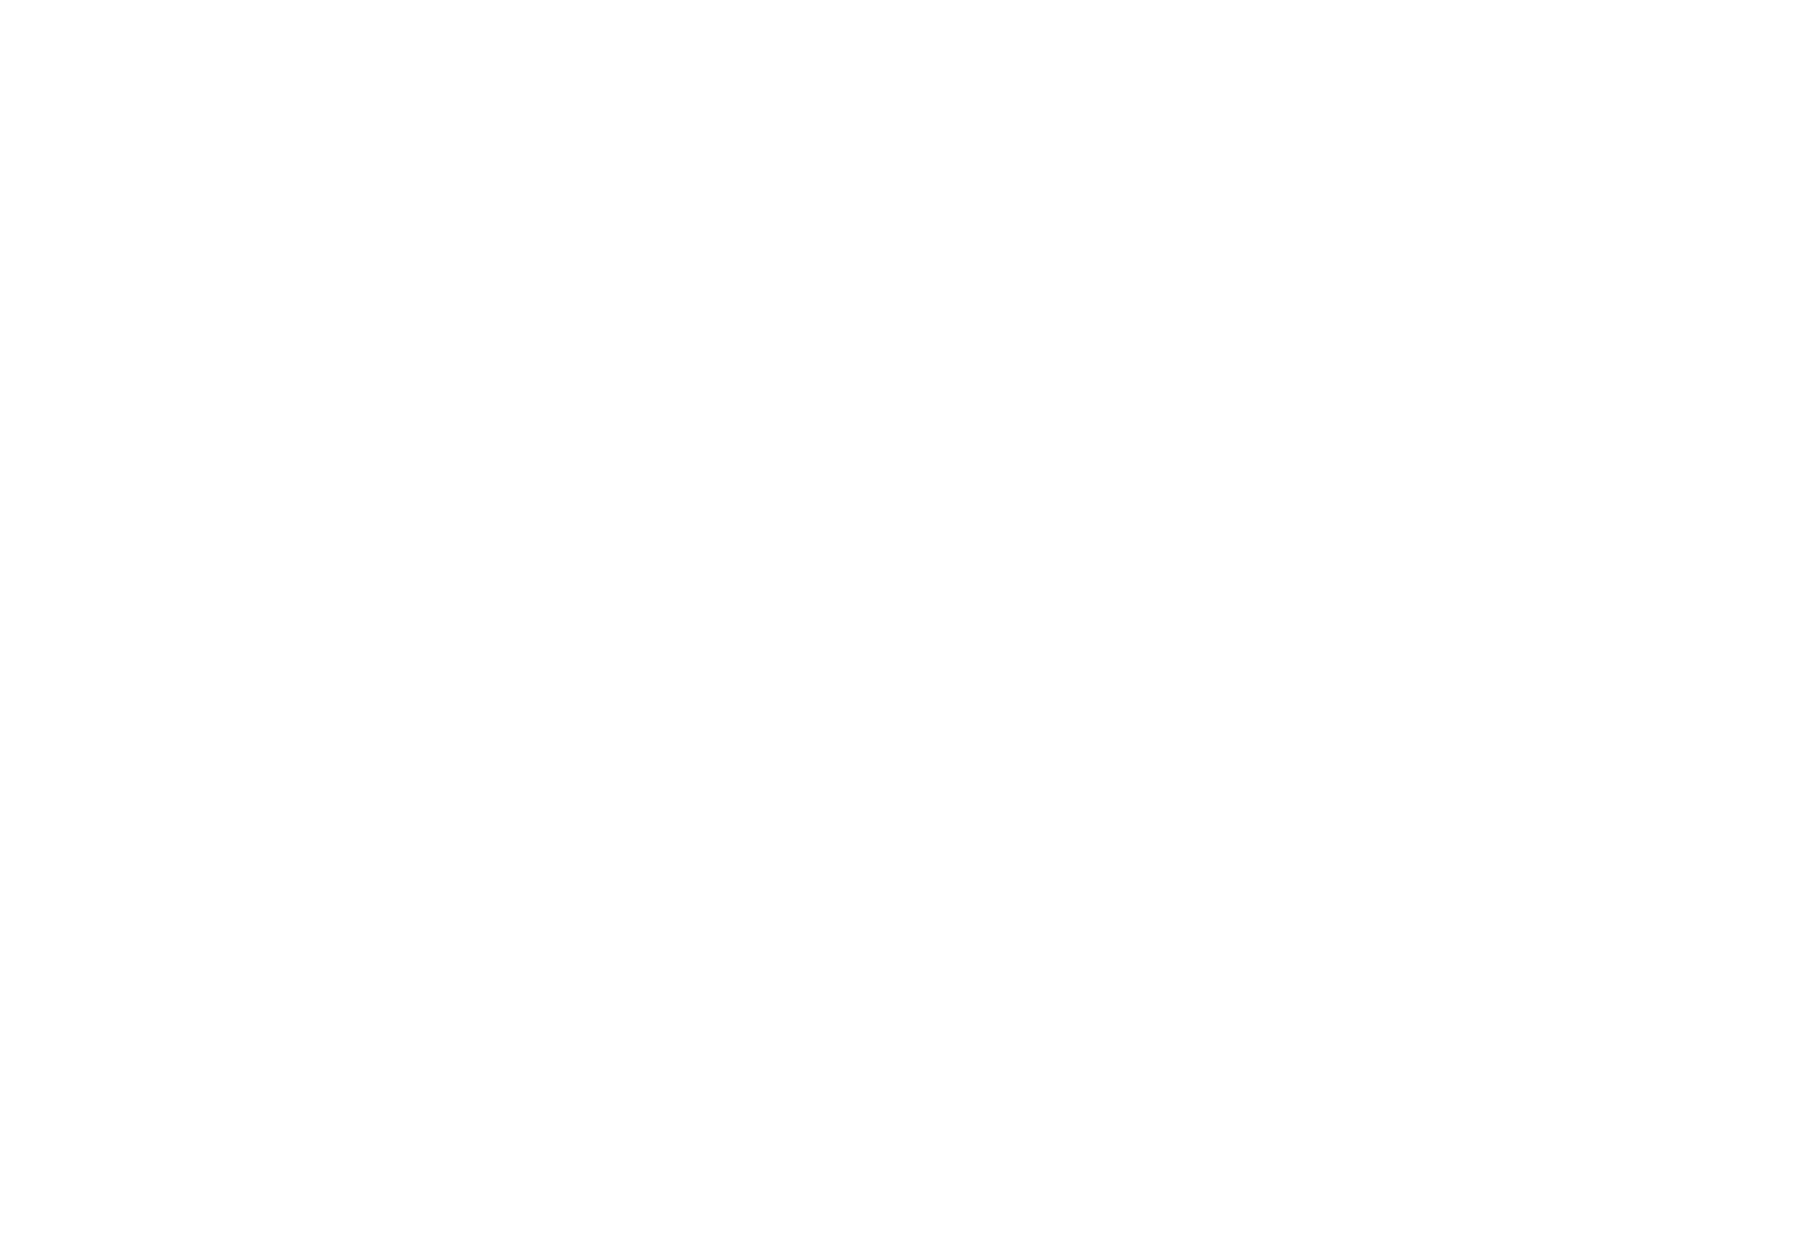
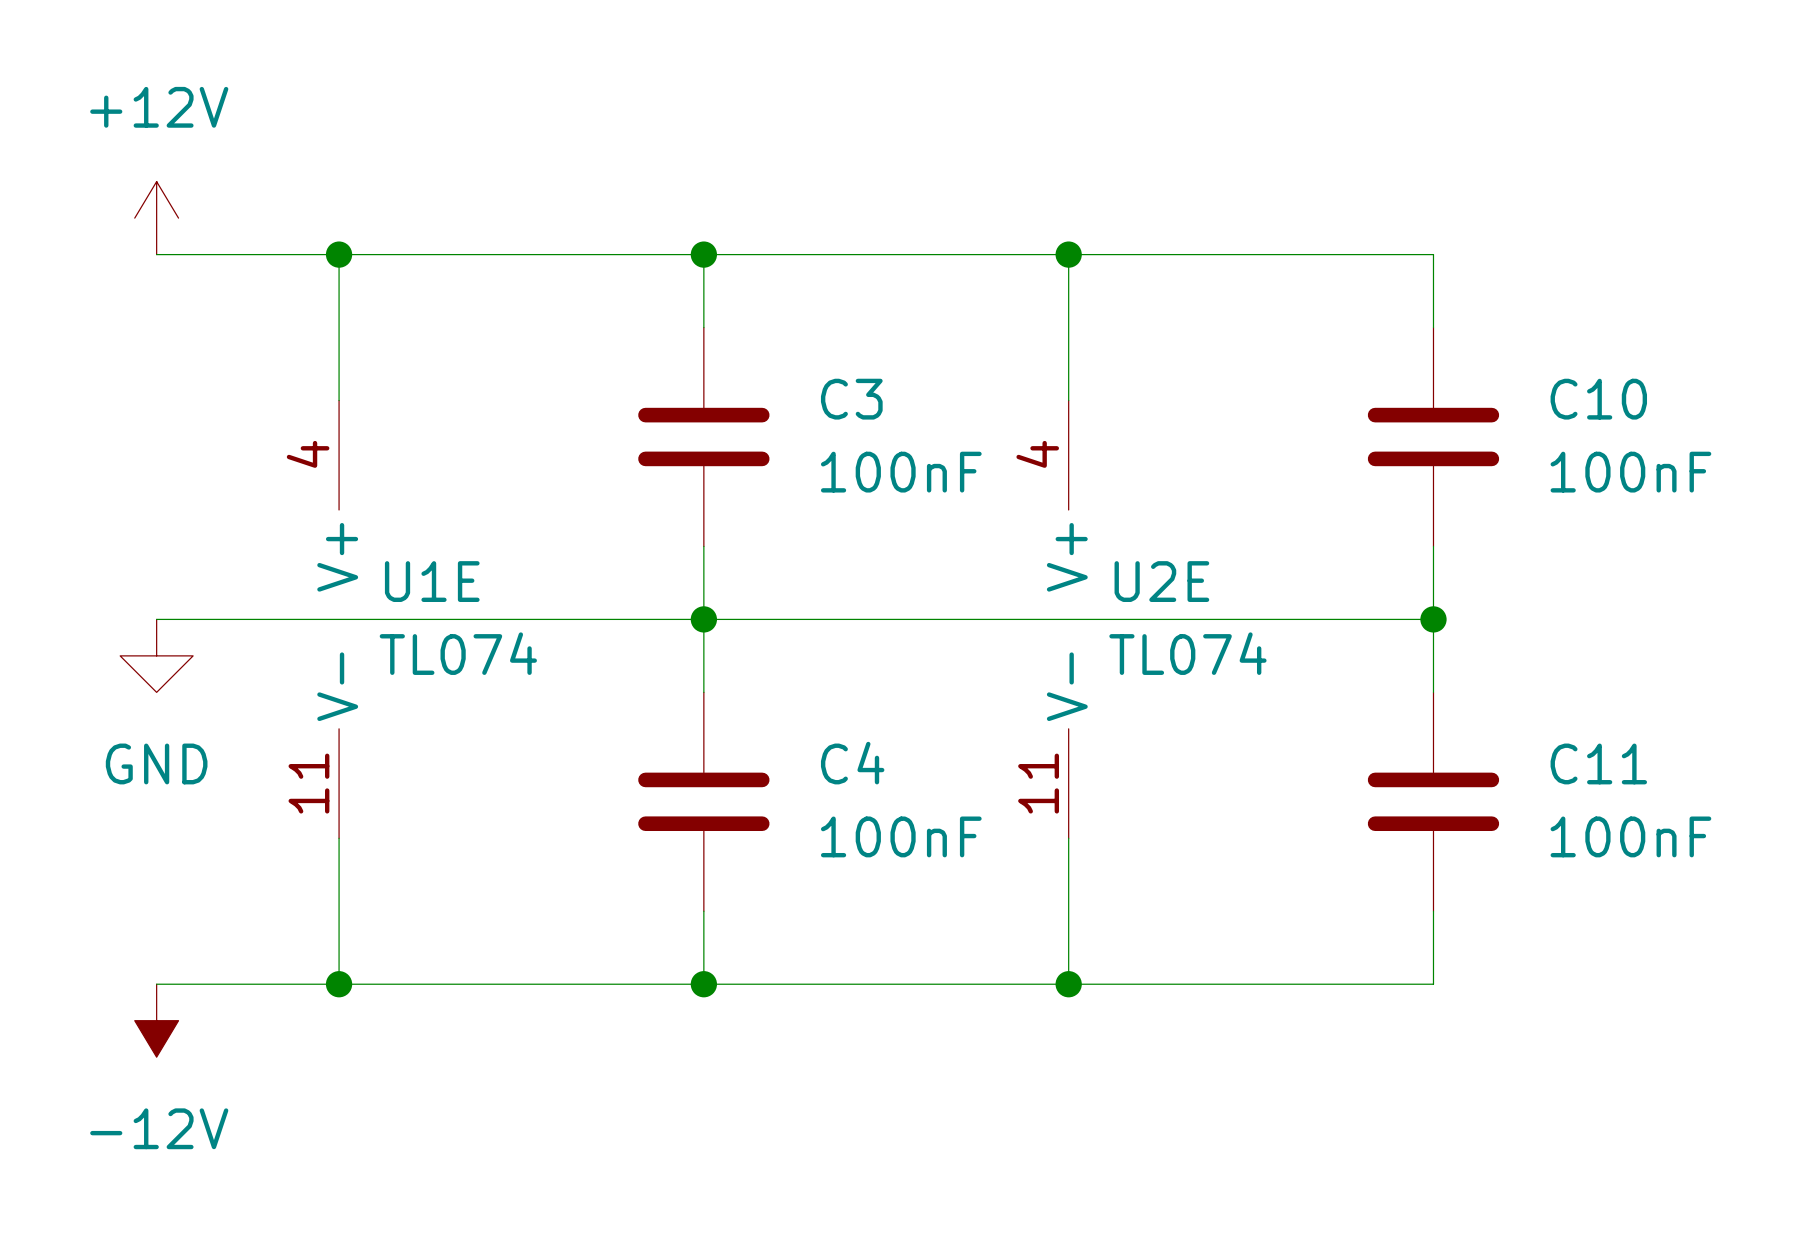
power symbol: none -> +12V (156, 218)
wire: none -> (156, 254) (1433, 254) (1433, 327)
wire: none -> (339, 254) (339, 400)
junction: none -> (339, 254)
wire: none -> (703, 254) (703, 327)
junction: none -> (703, 254)
wire: none -> (1068, 254) (1068, 400)
junction: none -> (1068, 254)
C3: none -> 100nF (703, 437)
C10: none -> 100nF (1433, 437)
wire: none -> (703, 546) (703, 692)
wire: none -> (1433, 546) (1433, 692)
wire: none -> (156, 619) (1433, 619)
U1E: none -> TL074 (339, 619)
junction: none -> (703, 619)
U2E: none -> TL074 (1068, 619)
junction: none -> (1433, 619)
power symbol: none -> GND (156, 655)
C4: none -> 100nF (703, 801)
C11: none -> 100nF (1433, 801)
wire: none -> (339, 838) (339, 984)
wire: none -> (1068, 838) (1068, 984)
wire: none -> (703, 911) (703, 984)
wire: none -> (1433, 911) (1433, 984) (156, 984)
junction: none -> (339, 984)
junction: none -> (703, 984)
junction: none -> (1068, 984)
power symbol: none -> -12V (156, 1020)

